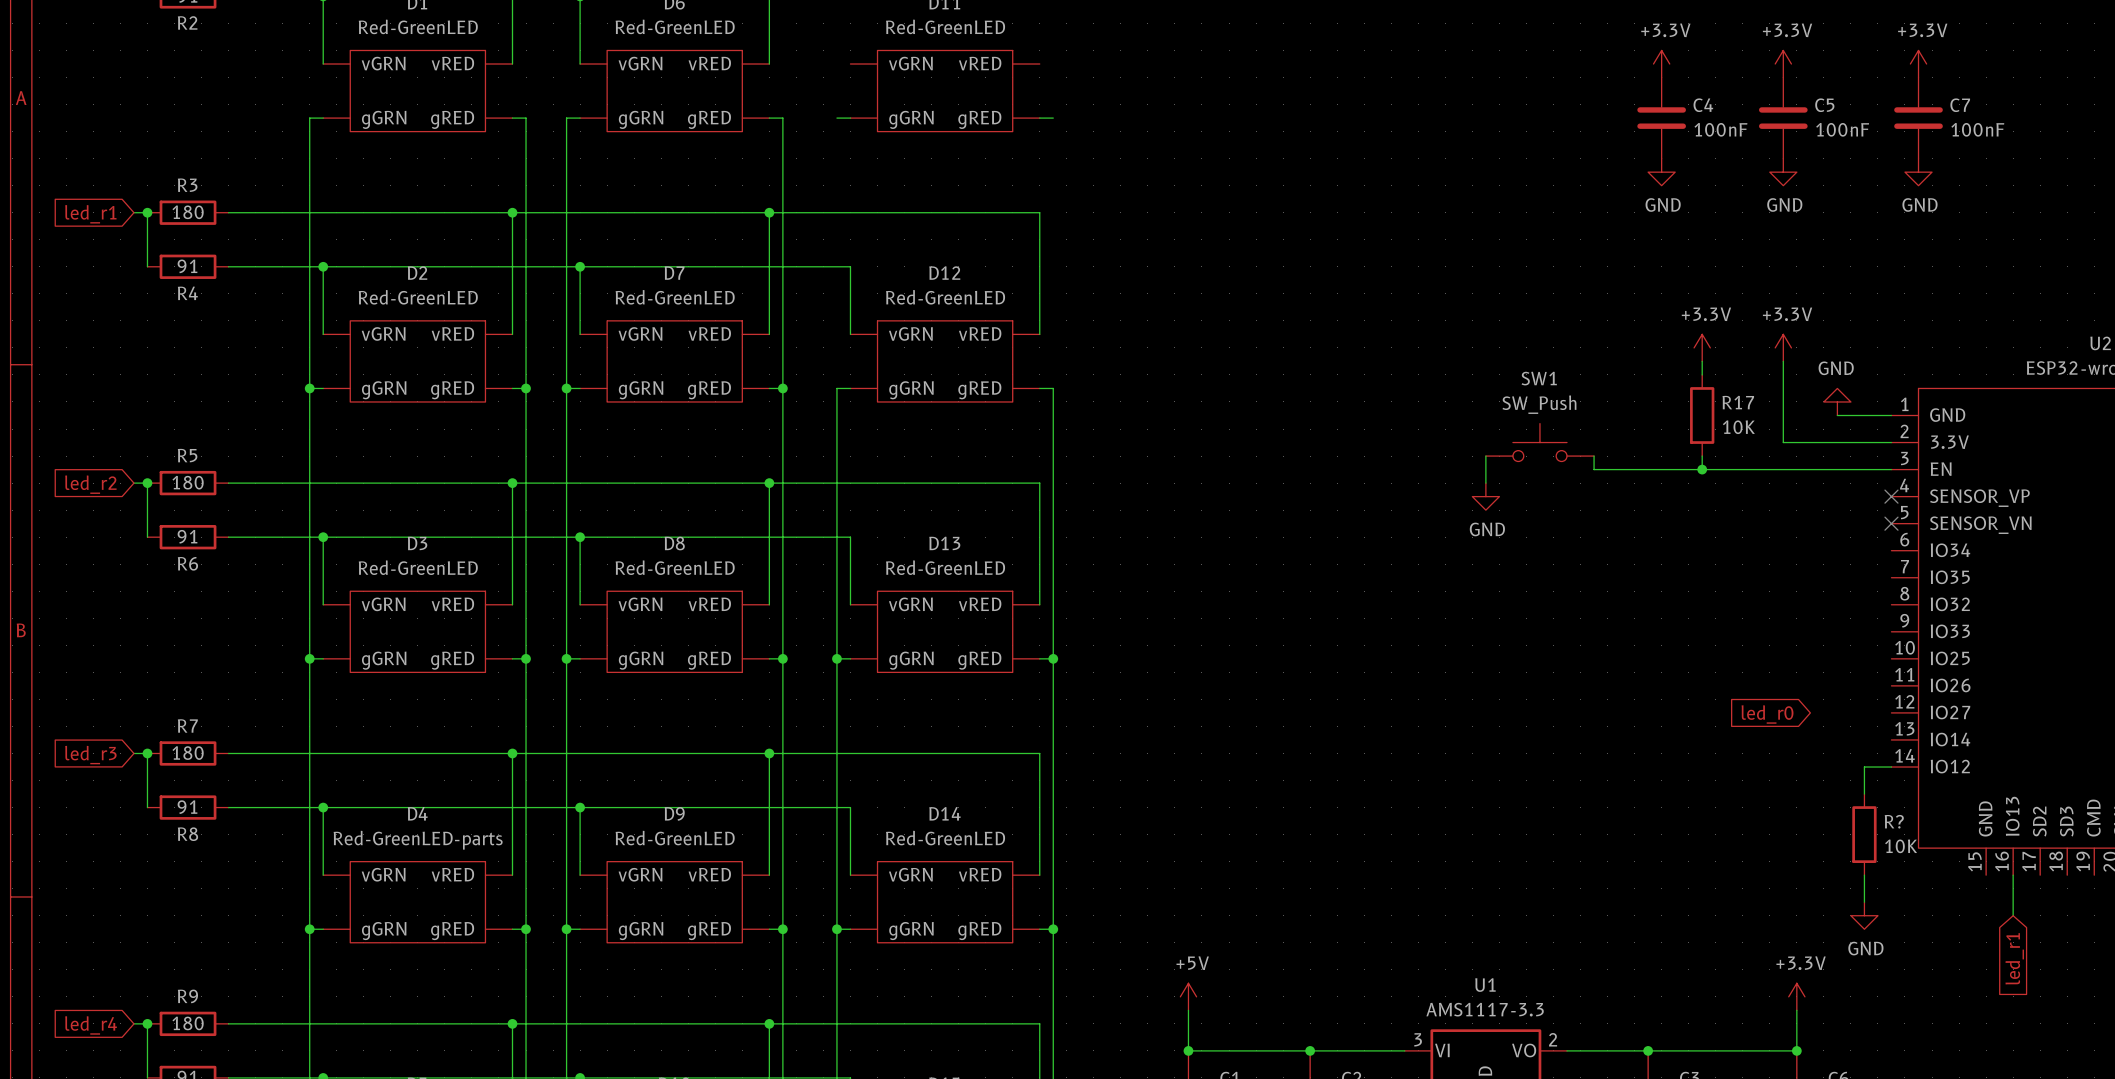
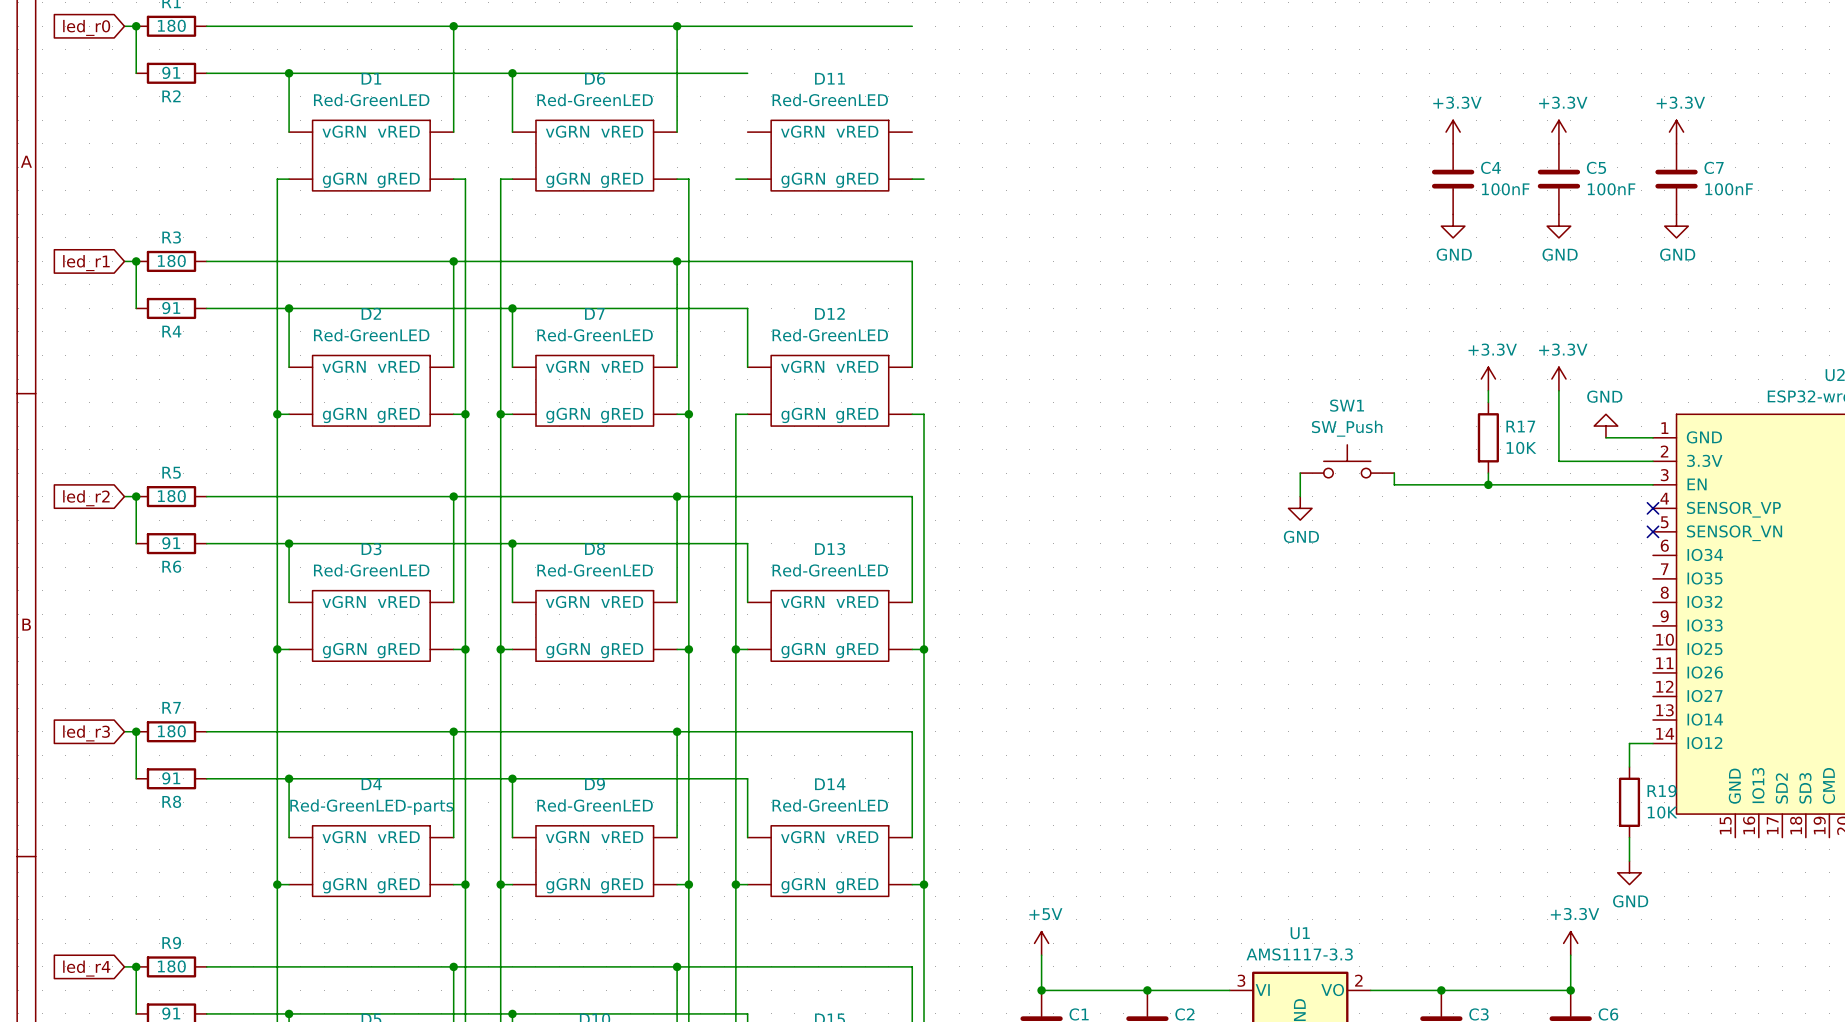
global label: led_r0 (1767, 714) -> none
R? name: R? (1894, 821) -> R19 (1662, 791)
wire: (2013, 875) (2013, 915) -> none
global label: led_r1 (2014, 958) -> none

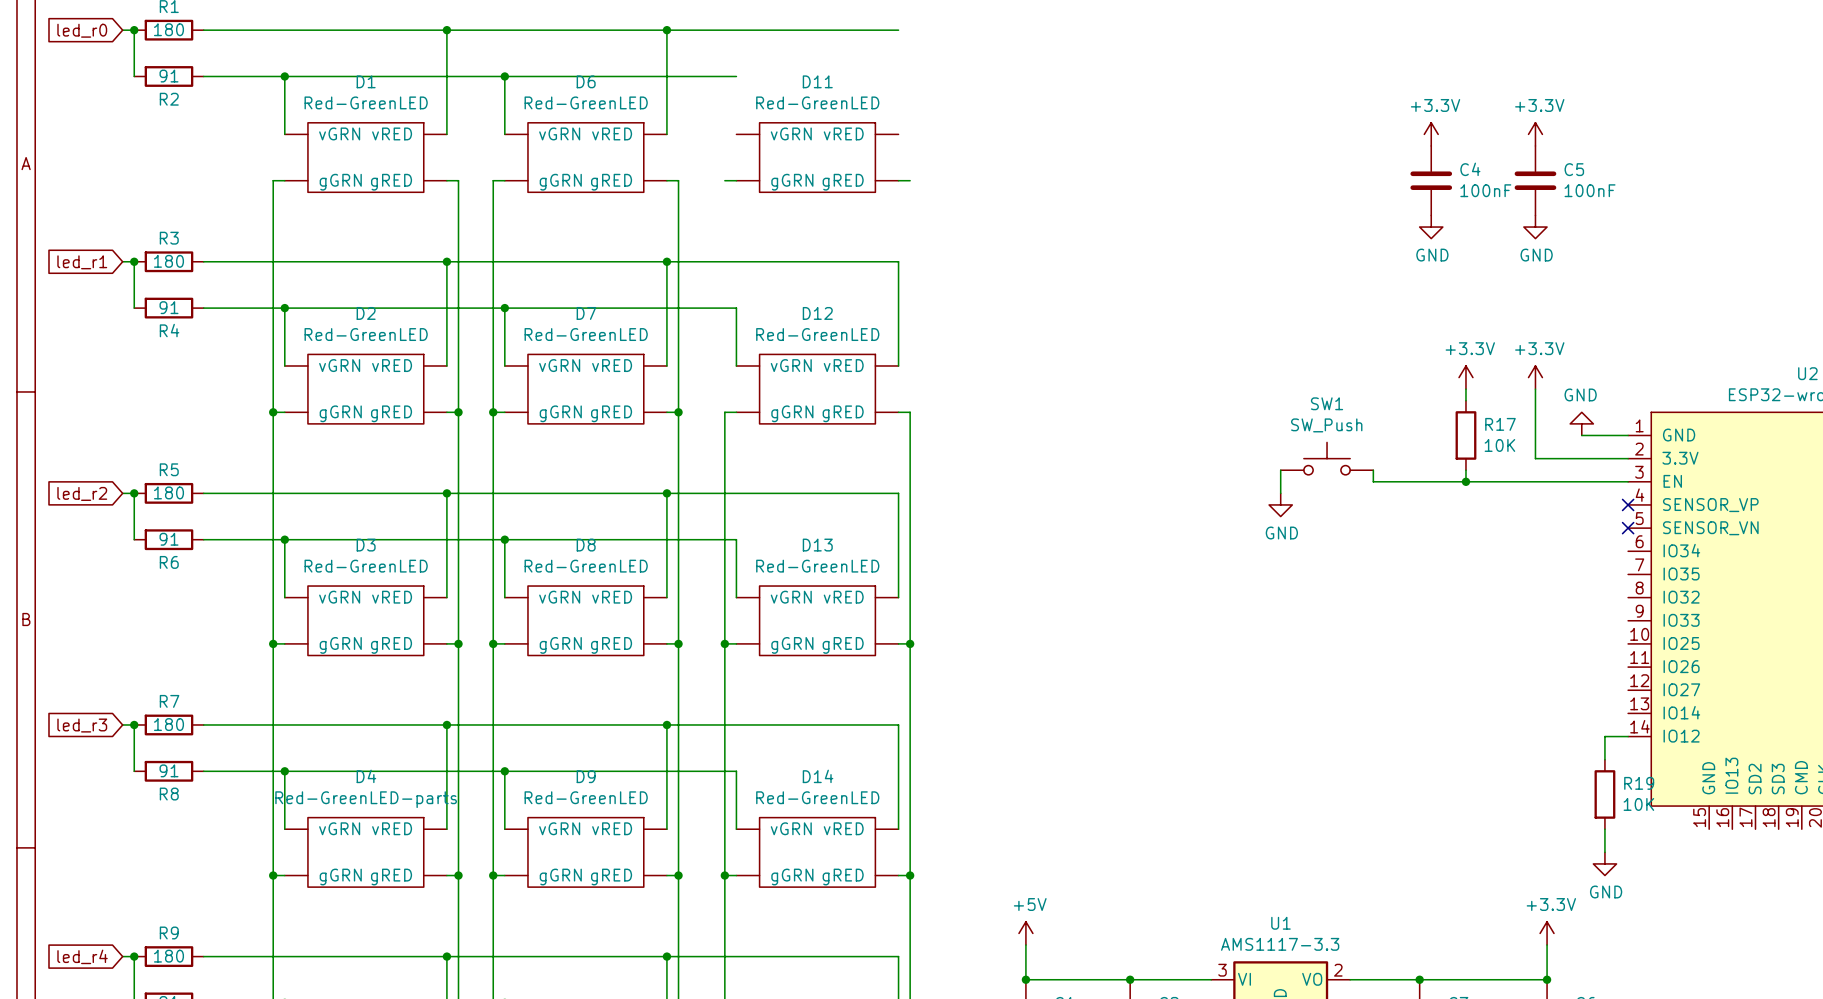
power symbol: +3.3V (1676, 132) -> none
C7: 100nF (1676, 179) -> none
power symbol: GND (1676, 226) -> none

